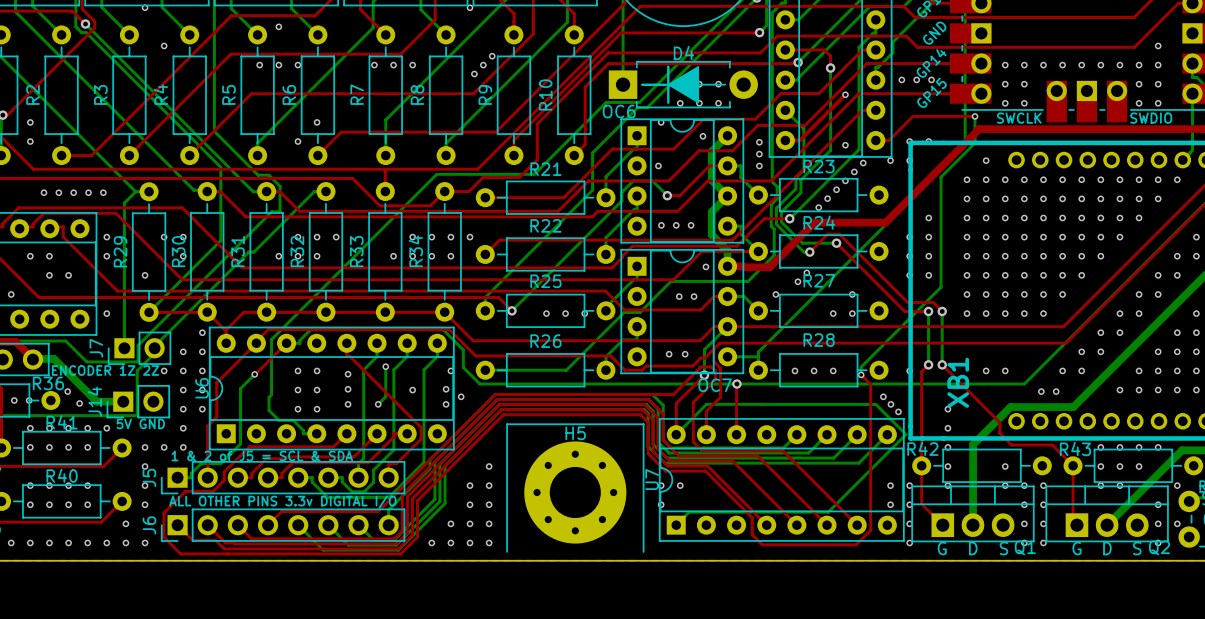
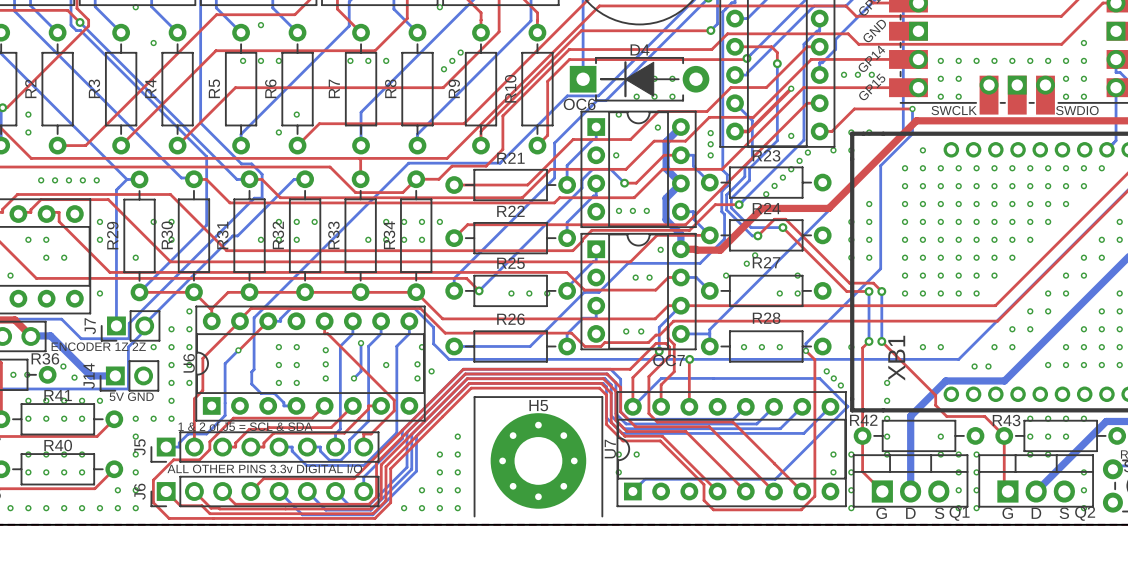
via: (1177, 485) -> none
via: none -> (135, 490)
via: (1177, 523) -> none

